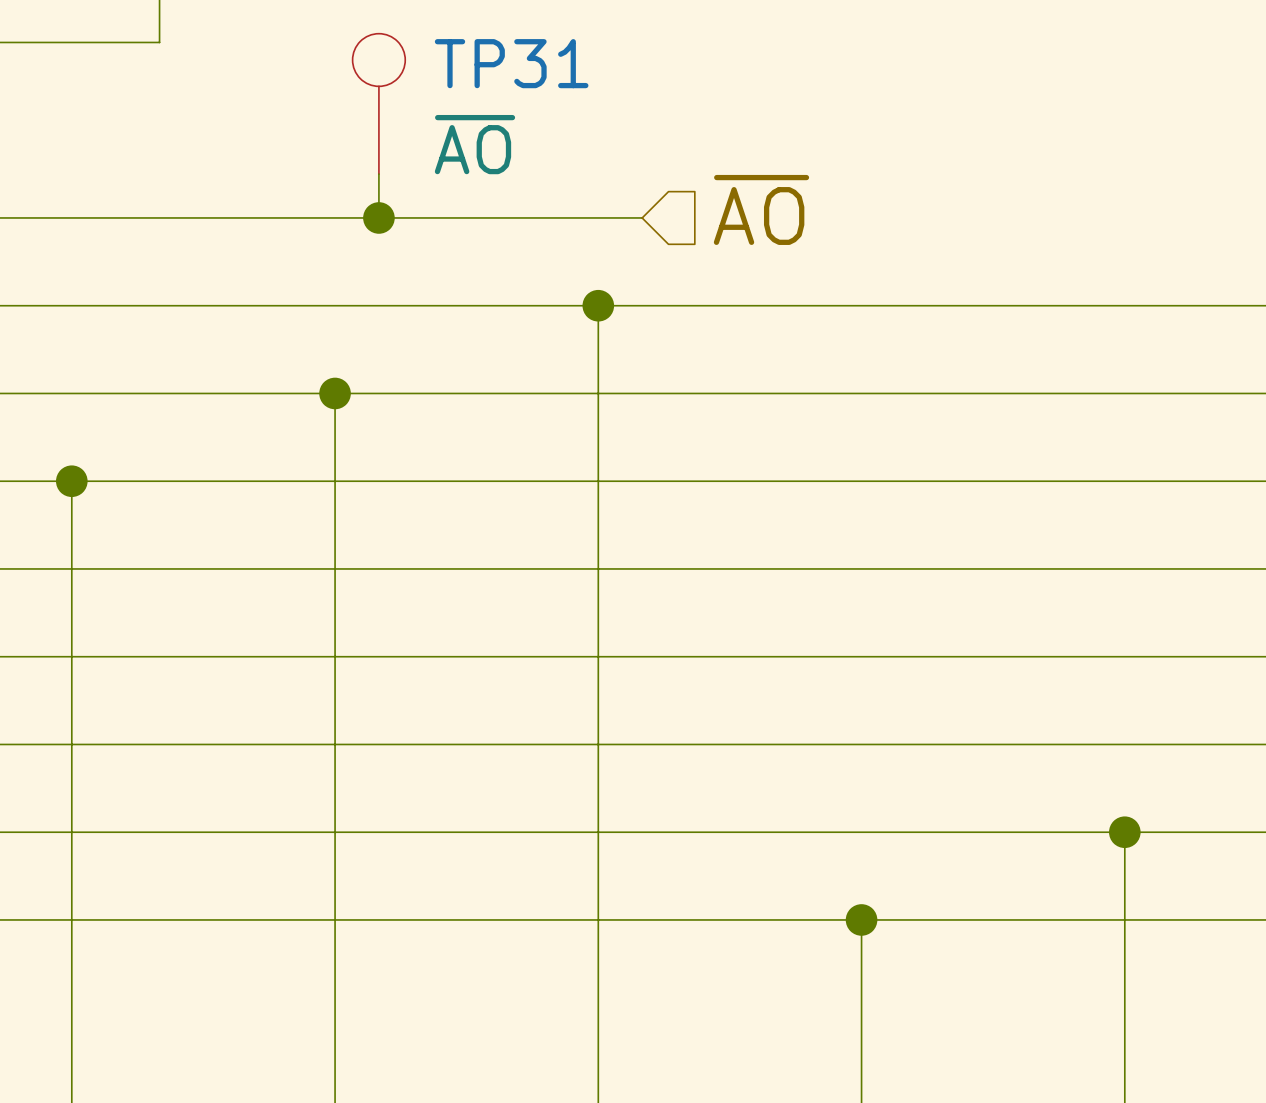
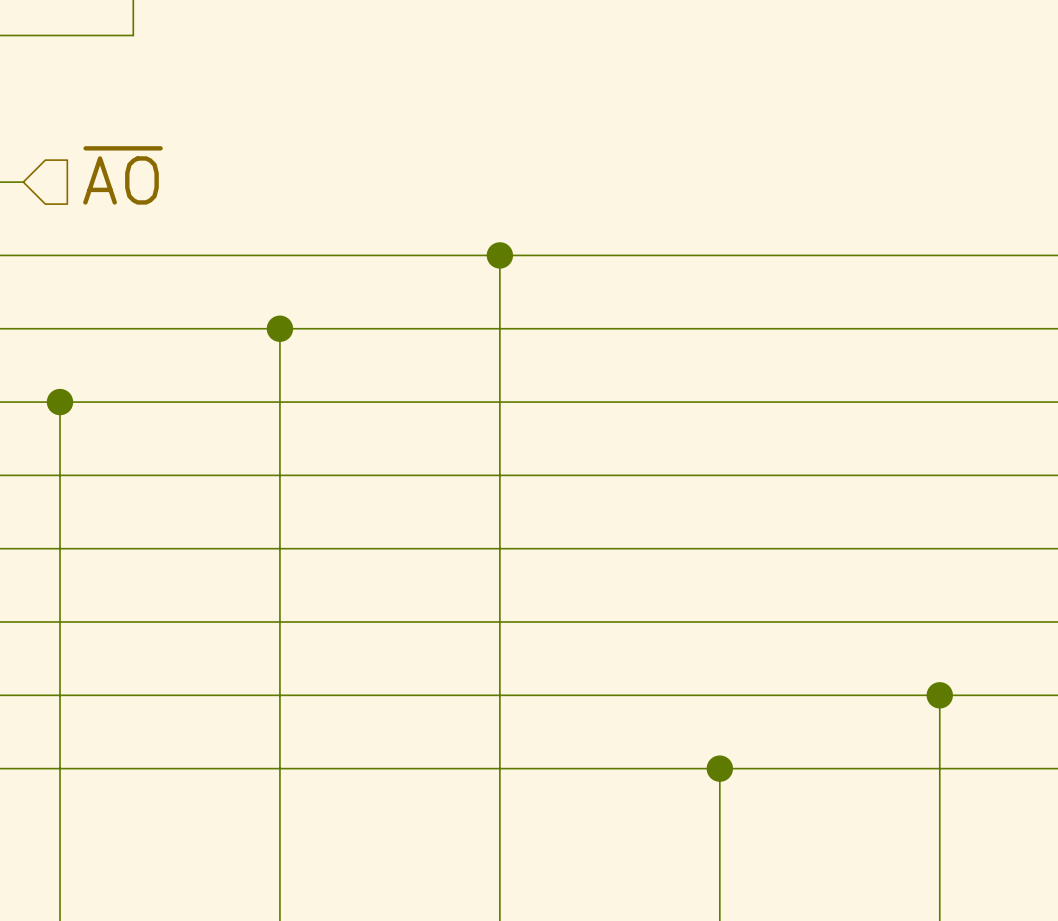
TP31: ~{AO} (378, 103) -> none
wire: (378, 174) (378, 217) -> none
hierarchical label position: ~{AO} (761, 209) -> ~{AO} (123, 175)
wire: (27, 217) (642, 217) -> none
junction: (378, 217) -> none

